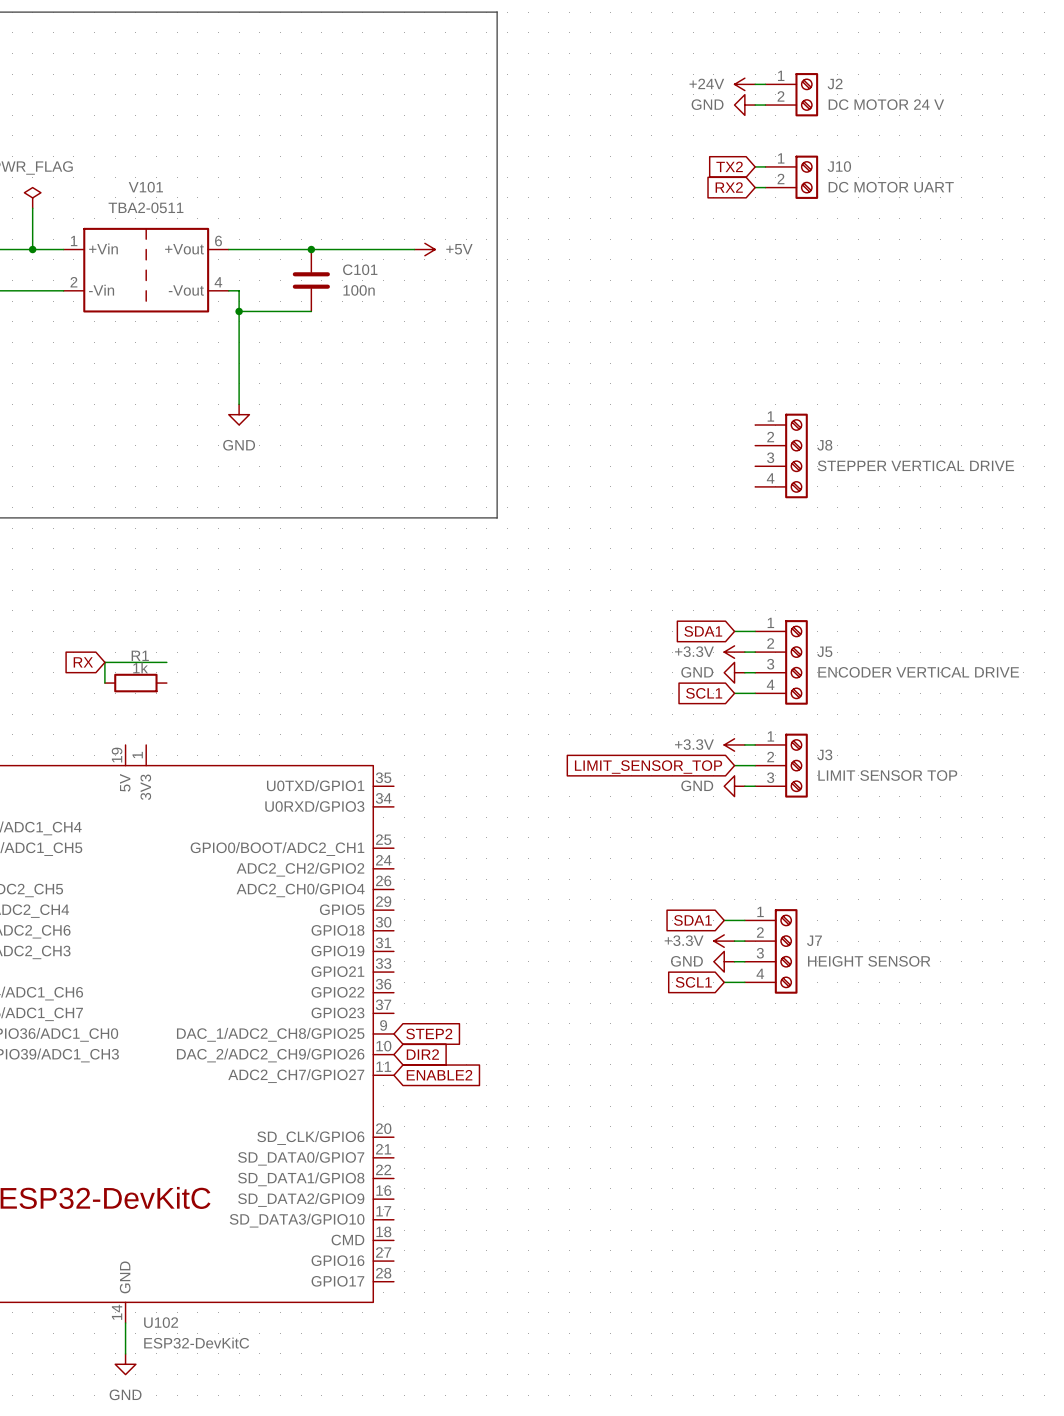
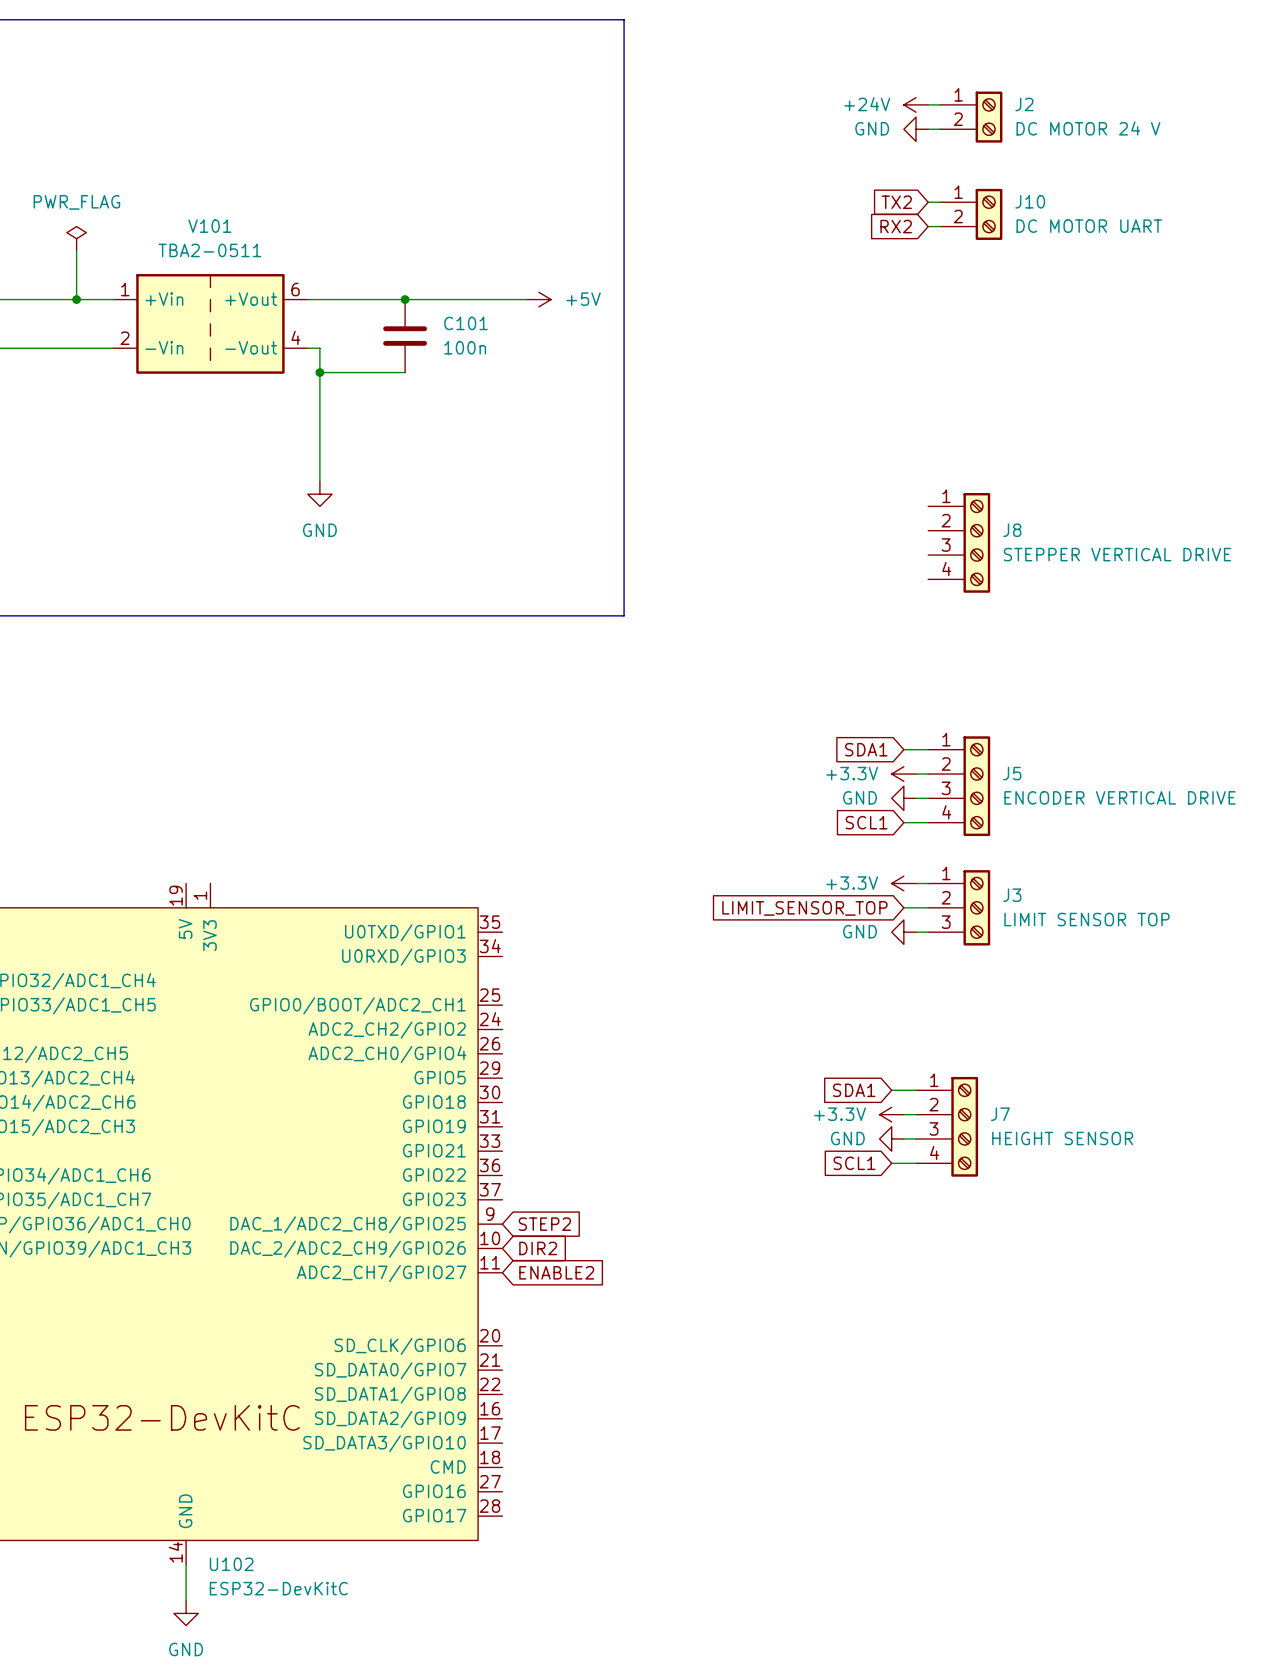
global label: RX (83, 662) -> none
wire: (166, 662) (104, 662) (104, 683) -> none
R1: 1k (135, 683) -> none

